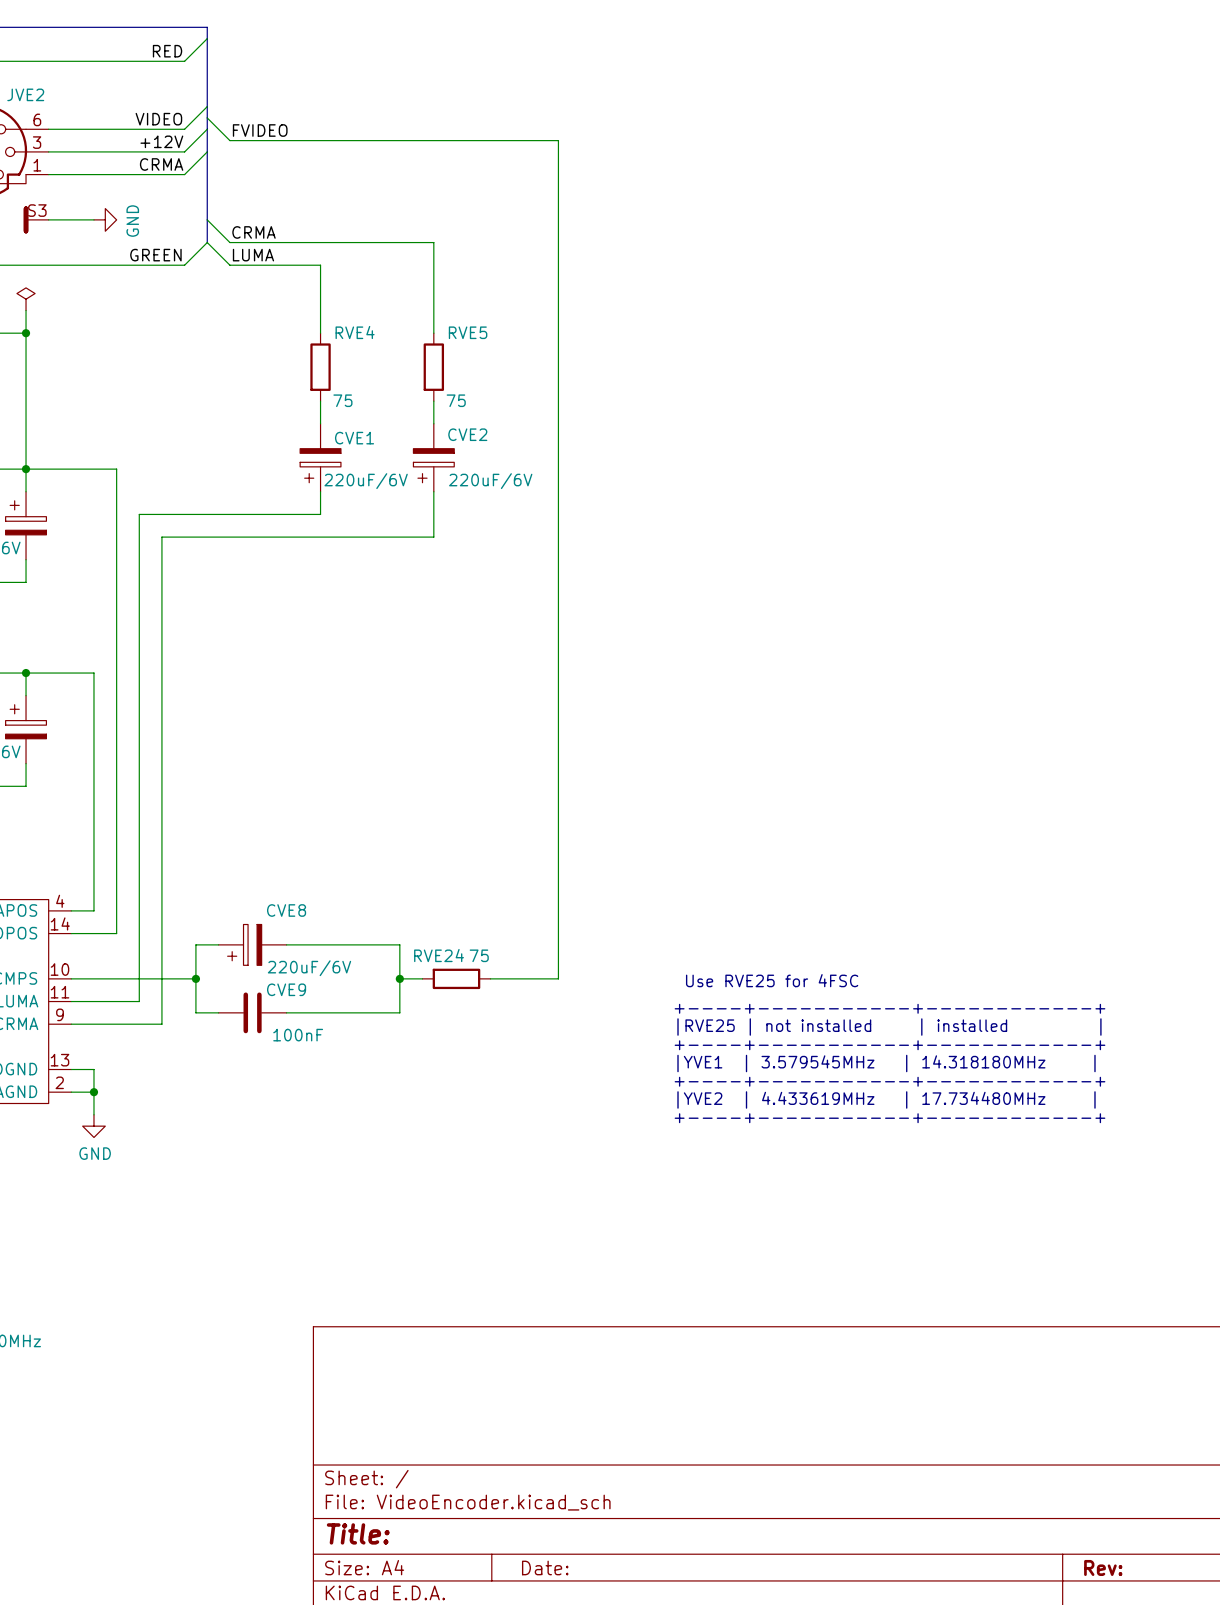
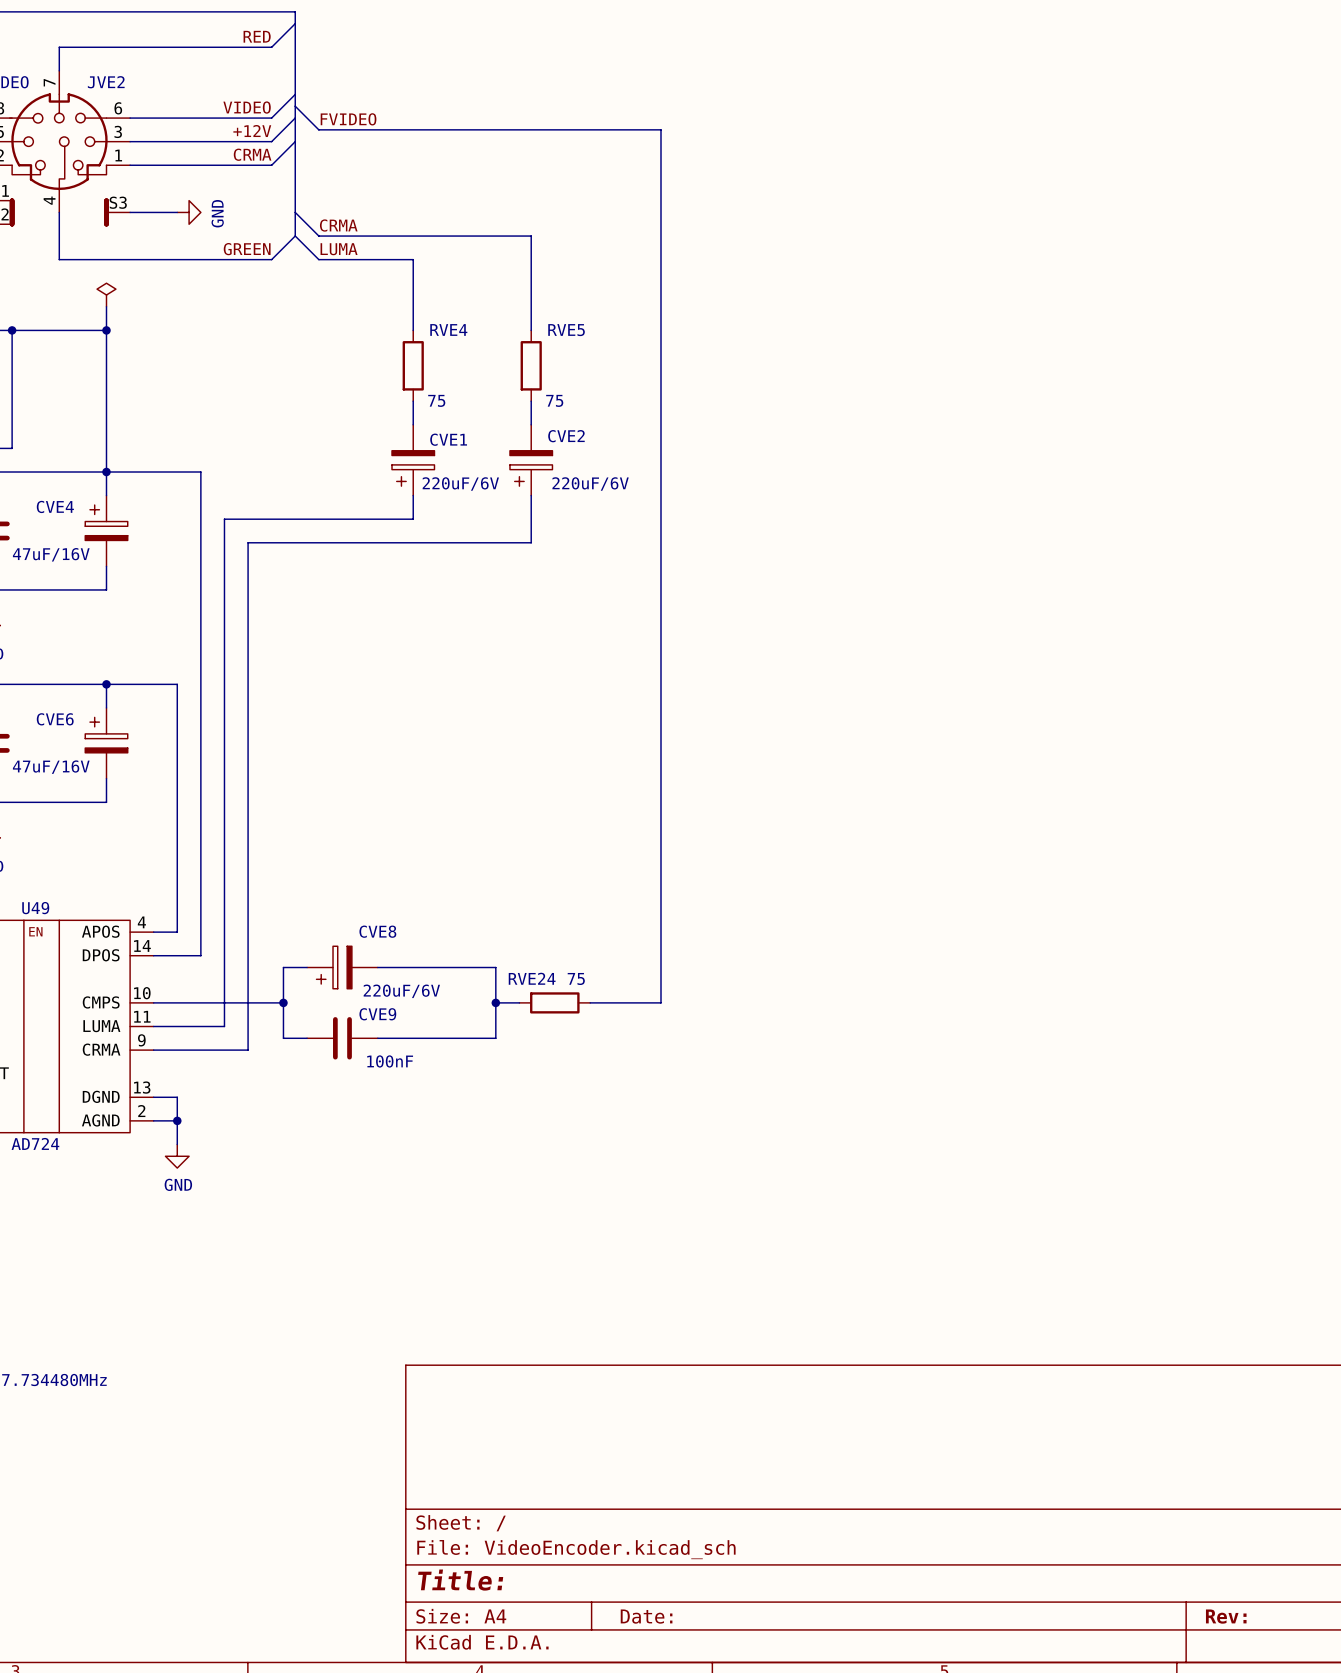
text: Use RVE25 for 4FSC (772, 980) -> none
text: +----+-----------+------------+ (890, 1008) -> none
text: |RVE25 | not installed | installed | (889, 1027) -> none
text: +----+-----------+------------+ (890, 1045) -> none
text: |YVE1 | 3.579545MHz | 14.318180MHz | (886, 1063) -> none
text: +----+-----------+------------+ (890, 1081) -> none
text: |YVE2 | 4.433619MHz | 17.734480MHz | (886, 1099) -> none
text: +----+-----------+------------+ (890, 1118) -> none

